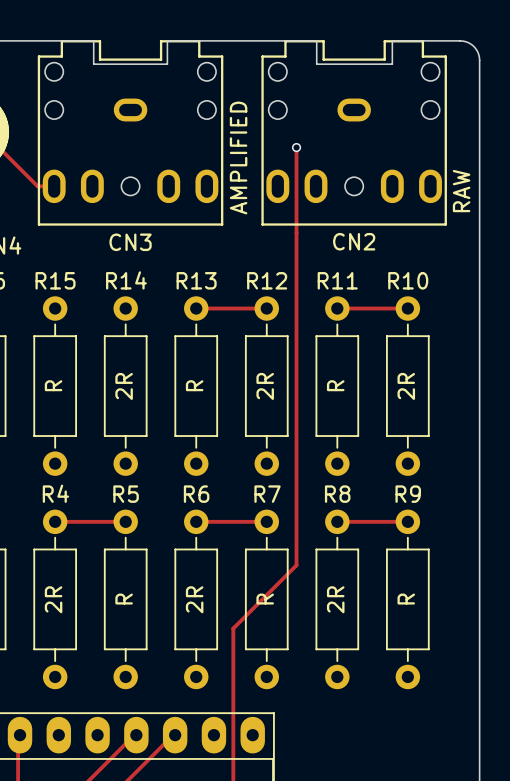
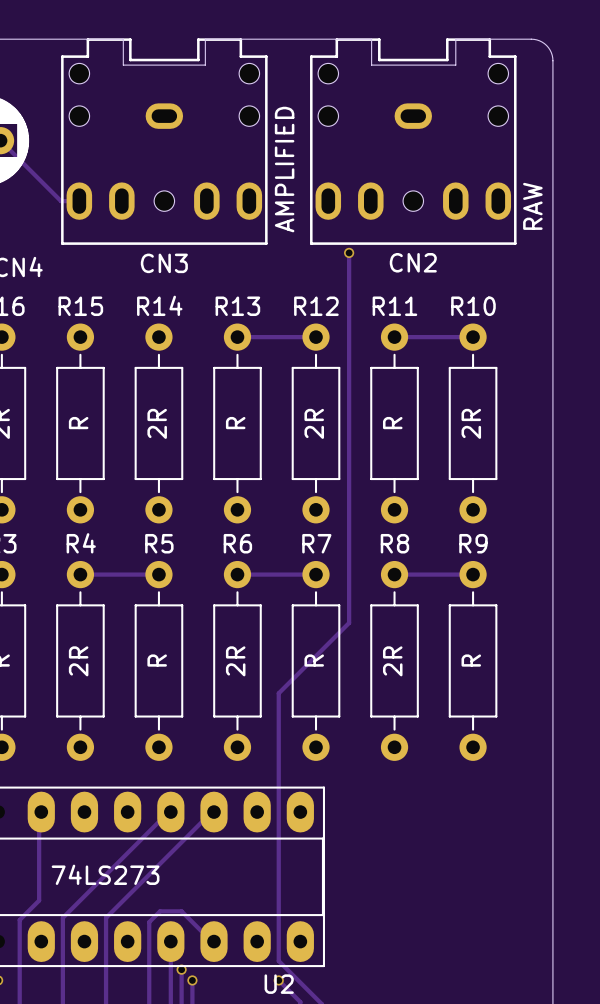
track: (296, 147) (296, 232) -> none
via position: (296, 147) -> (349, 252)

